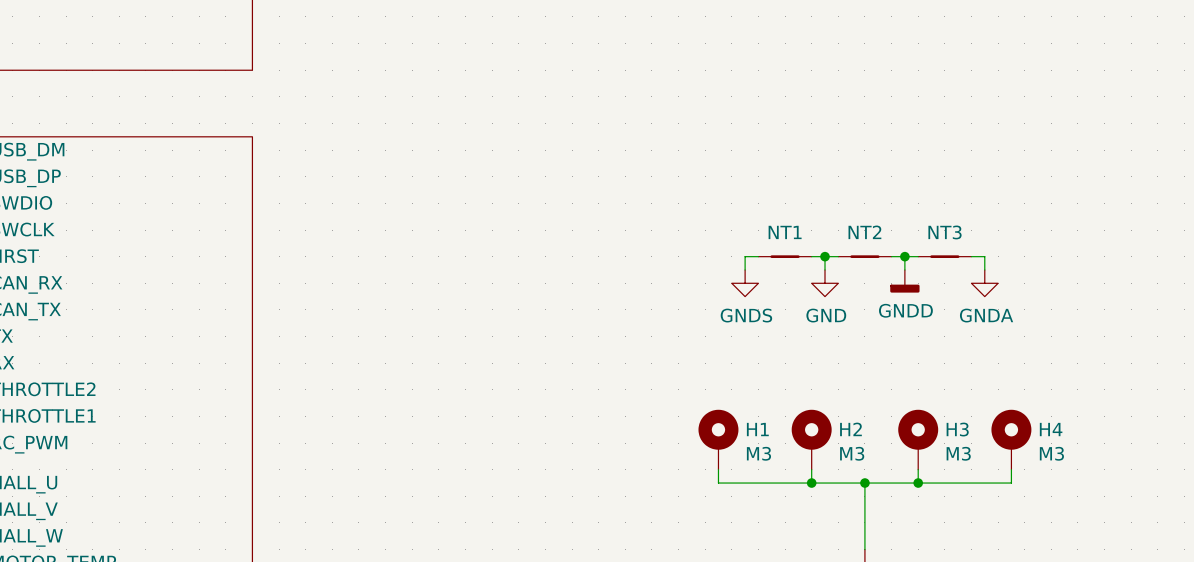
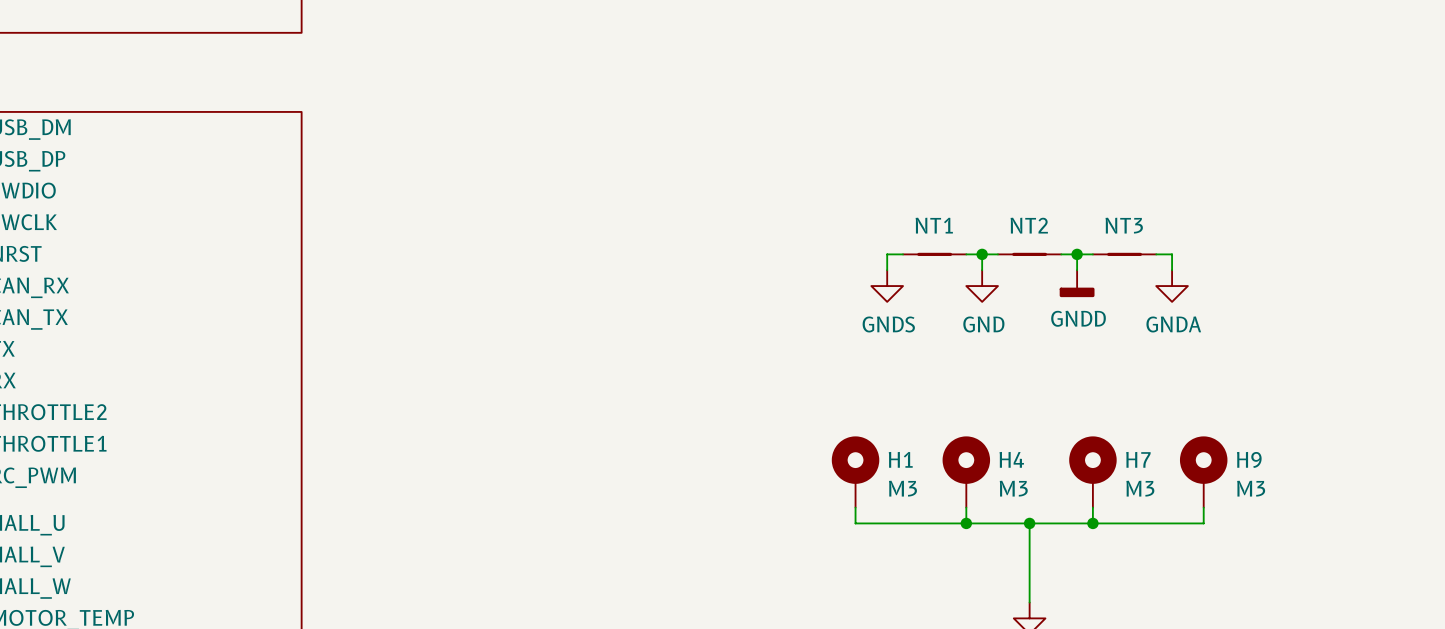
H2 name: H2 (850, 429) -> H4 (1011, 459)
H3 name: H3 (957, 429) -> H7 (1138, 459)
H4 name: H4 (1051, 429) -> H9 (1249, 459)

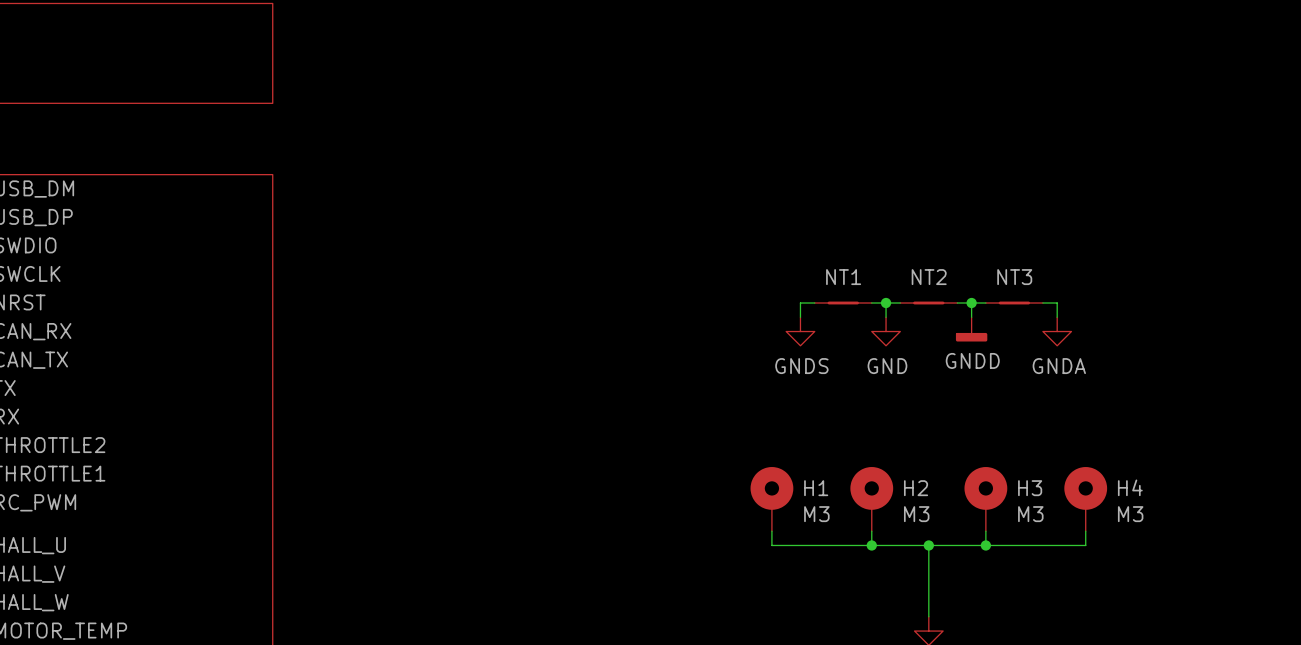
H4 name: H4 (1011, 459) -> H2 (916, 488)
H7 name: H7 (1138, 459) -> H3 (1030, 488)
H9 name: H9 (1249, 459) -> H4 (1130, 487)

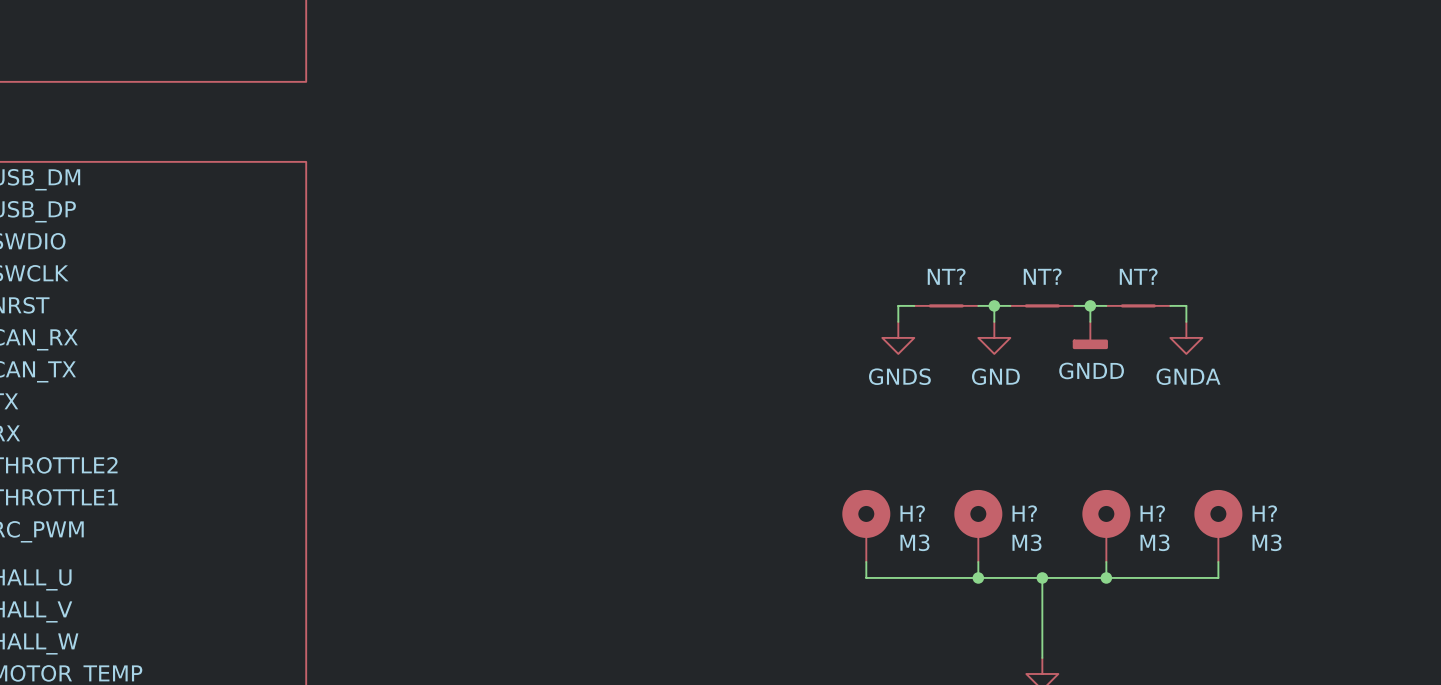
NT1 name: NT1 (843, 277) -> NT? (946, 276)
NT2 name: NT2 (929, 277) -> NT? (1042, 276)
NT3 name: NT3 (1014, 277) -> NT? (1138, 276)
H4 name: H4 (1130, 487) -> H? (1264, 513)
H1 name: H1 (816, 488) -> H? (912, 513)
H2 name: H2 (916, 488) -> H? (1024, 513)
H3 name: H3 (1030, 488) -> H? (1152, 513)

